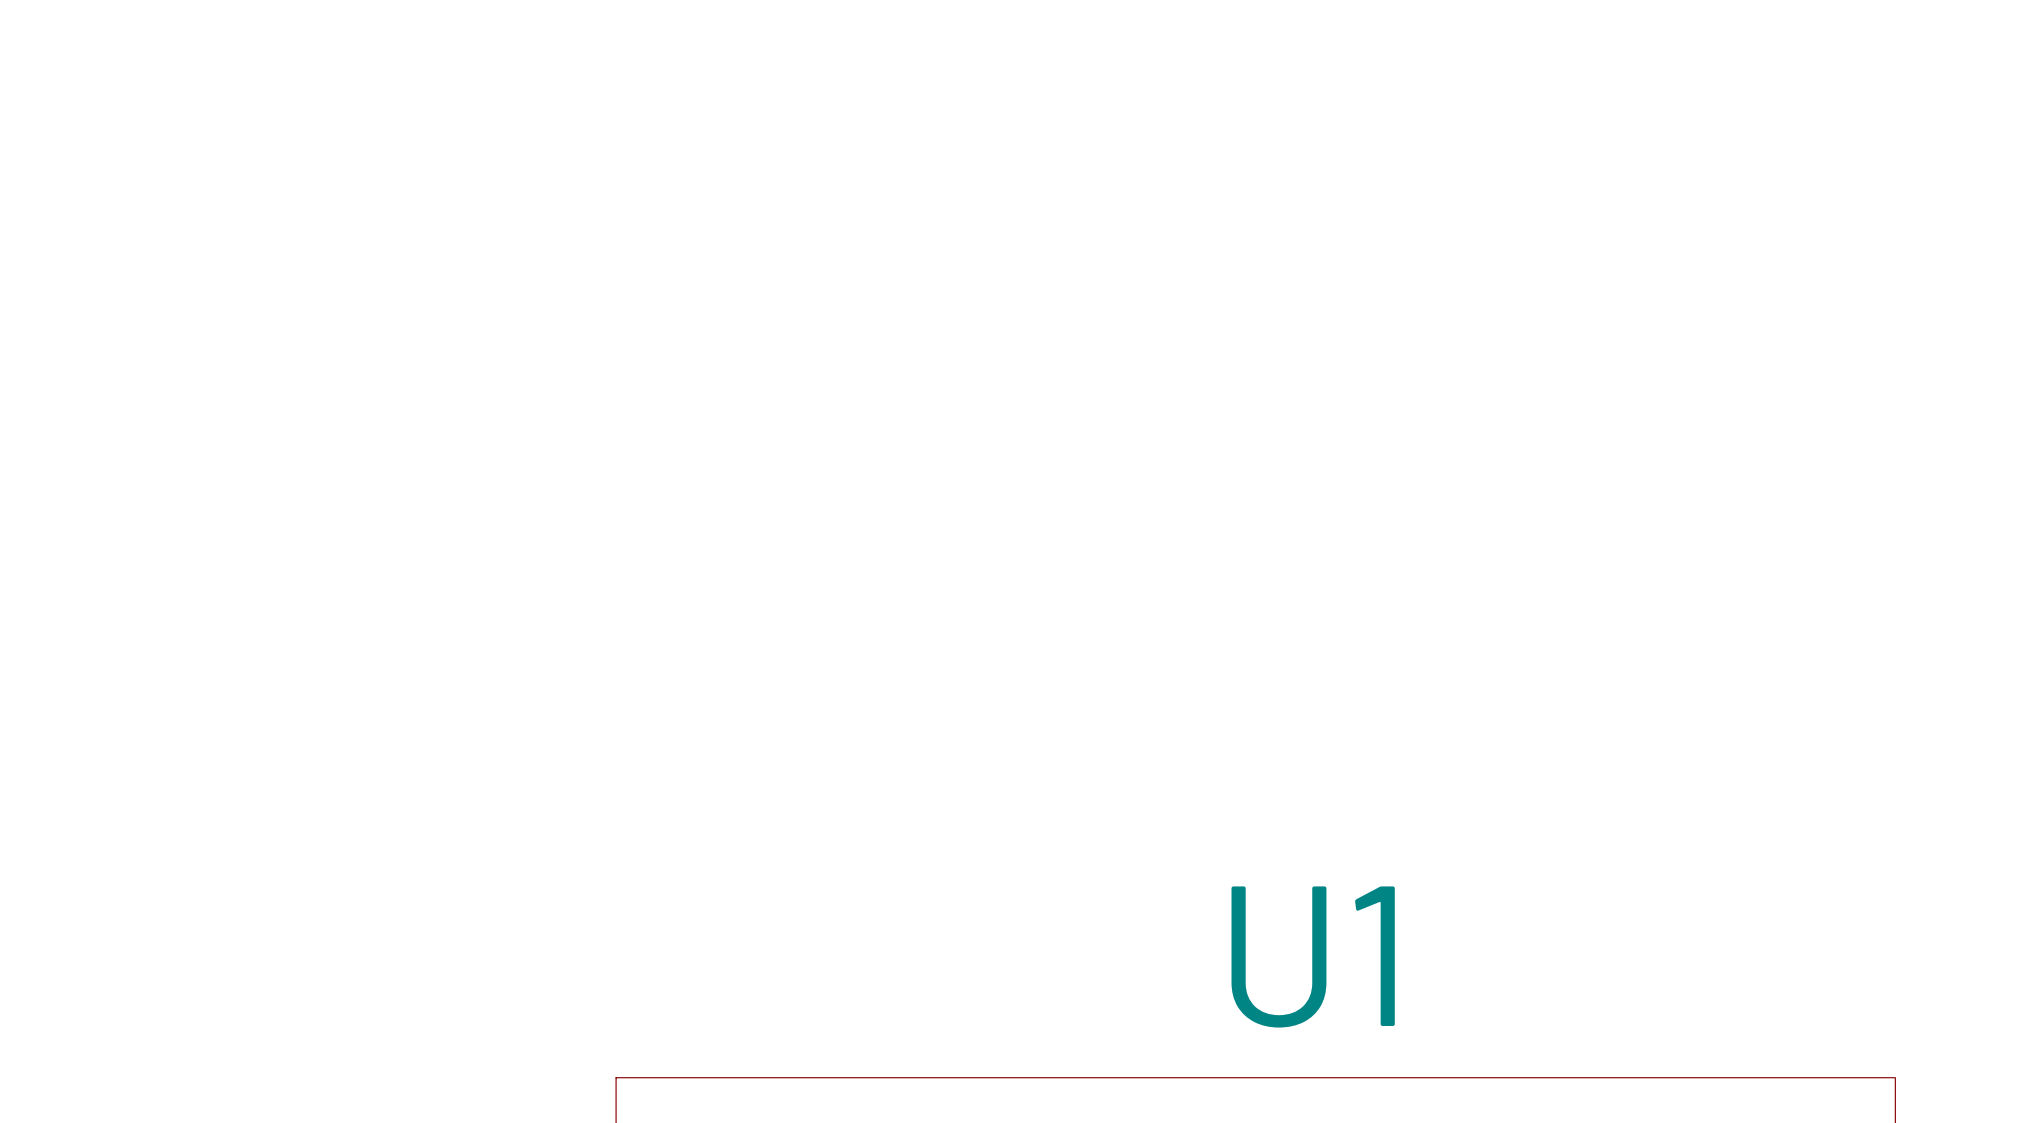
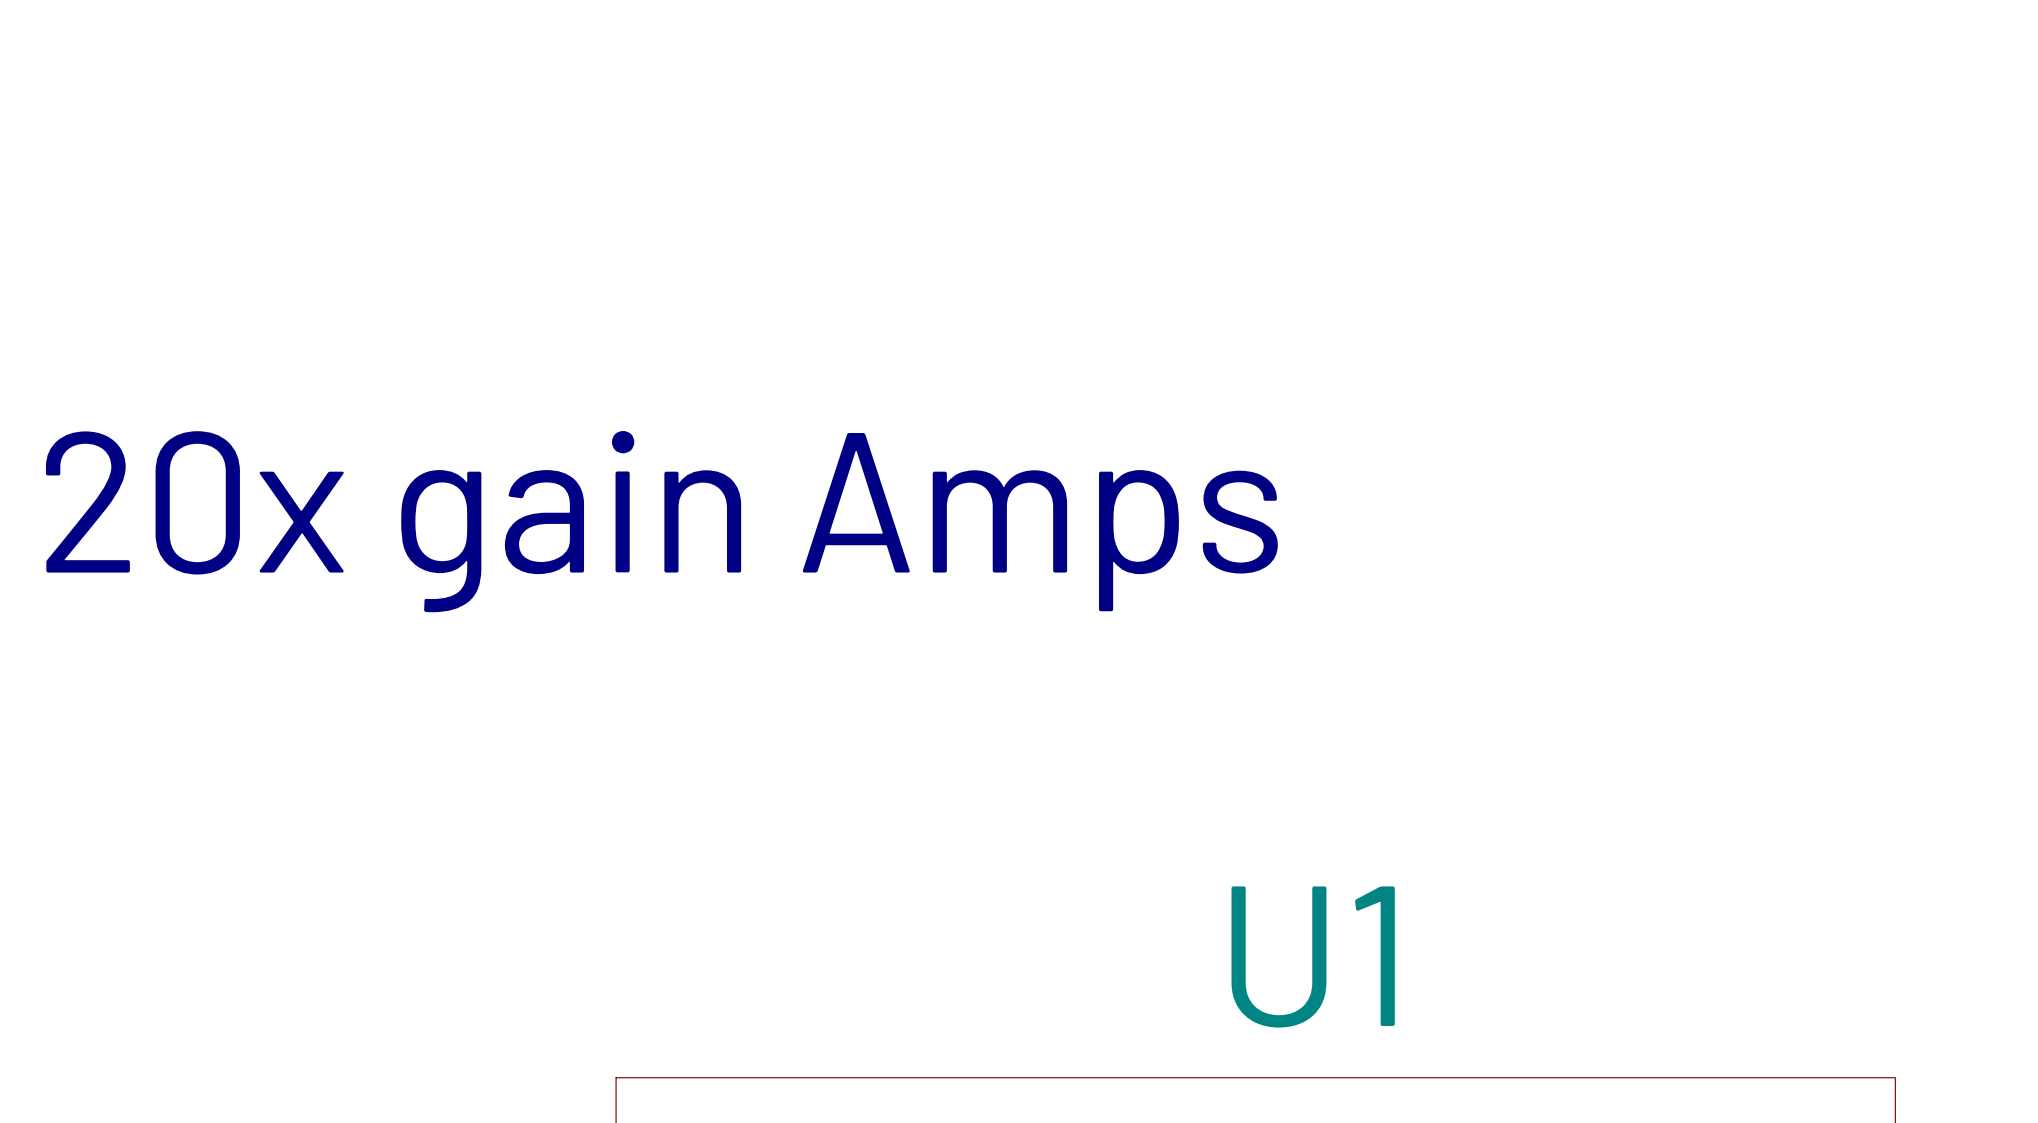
text: none -> 20x gain Amps (661, 521)

